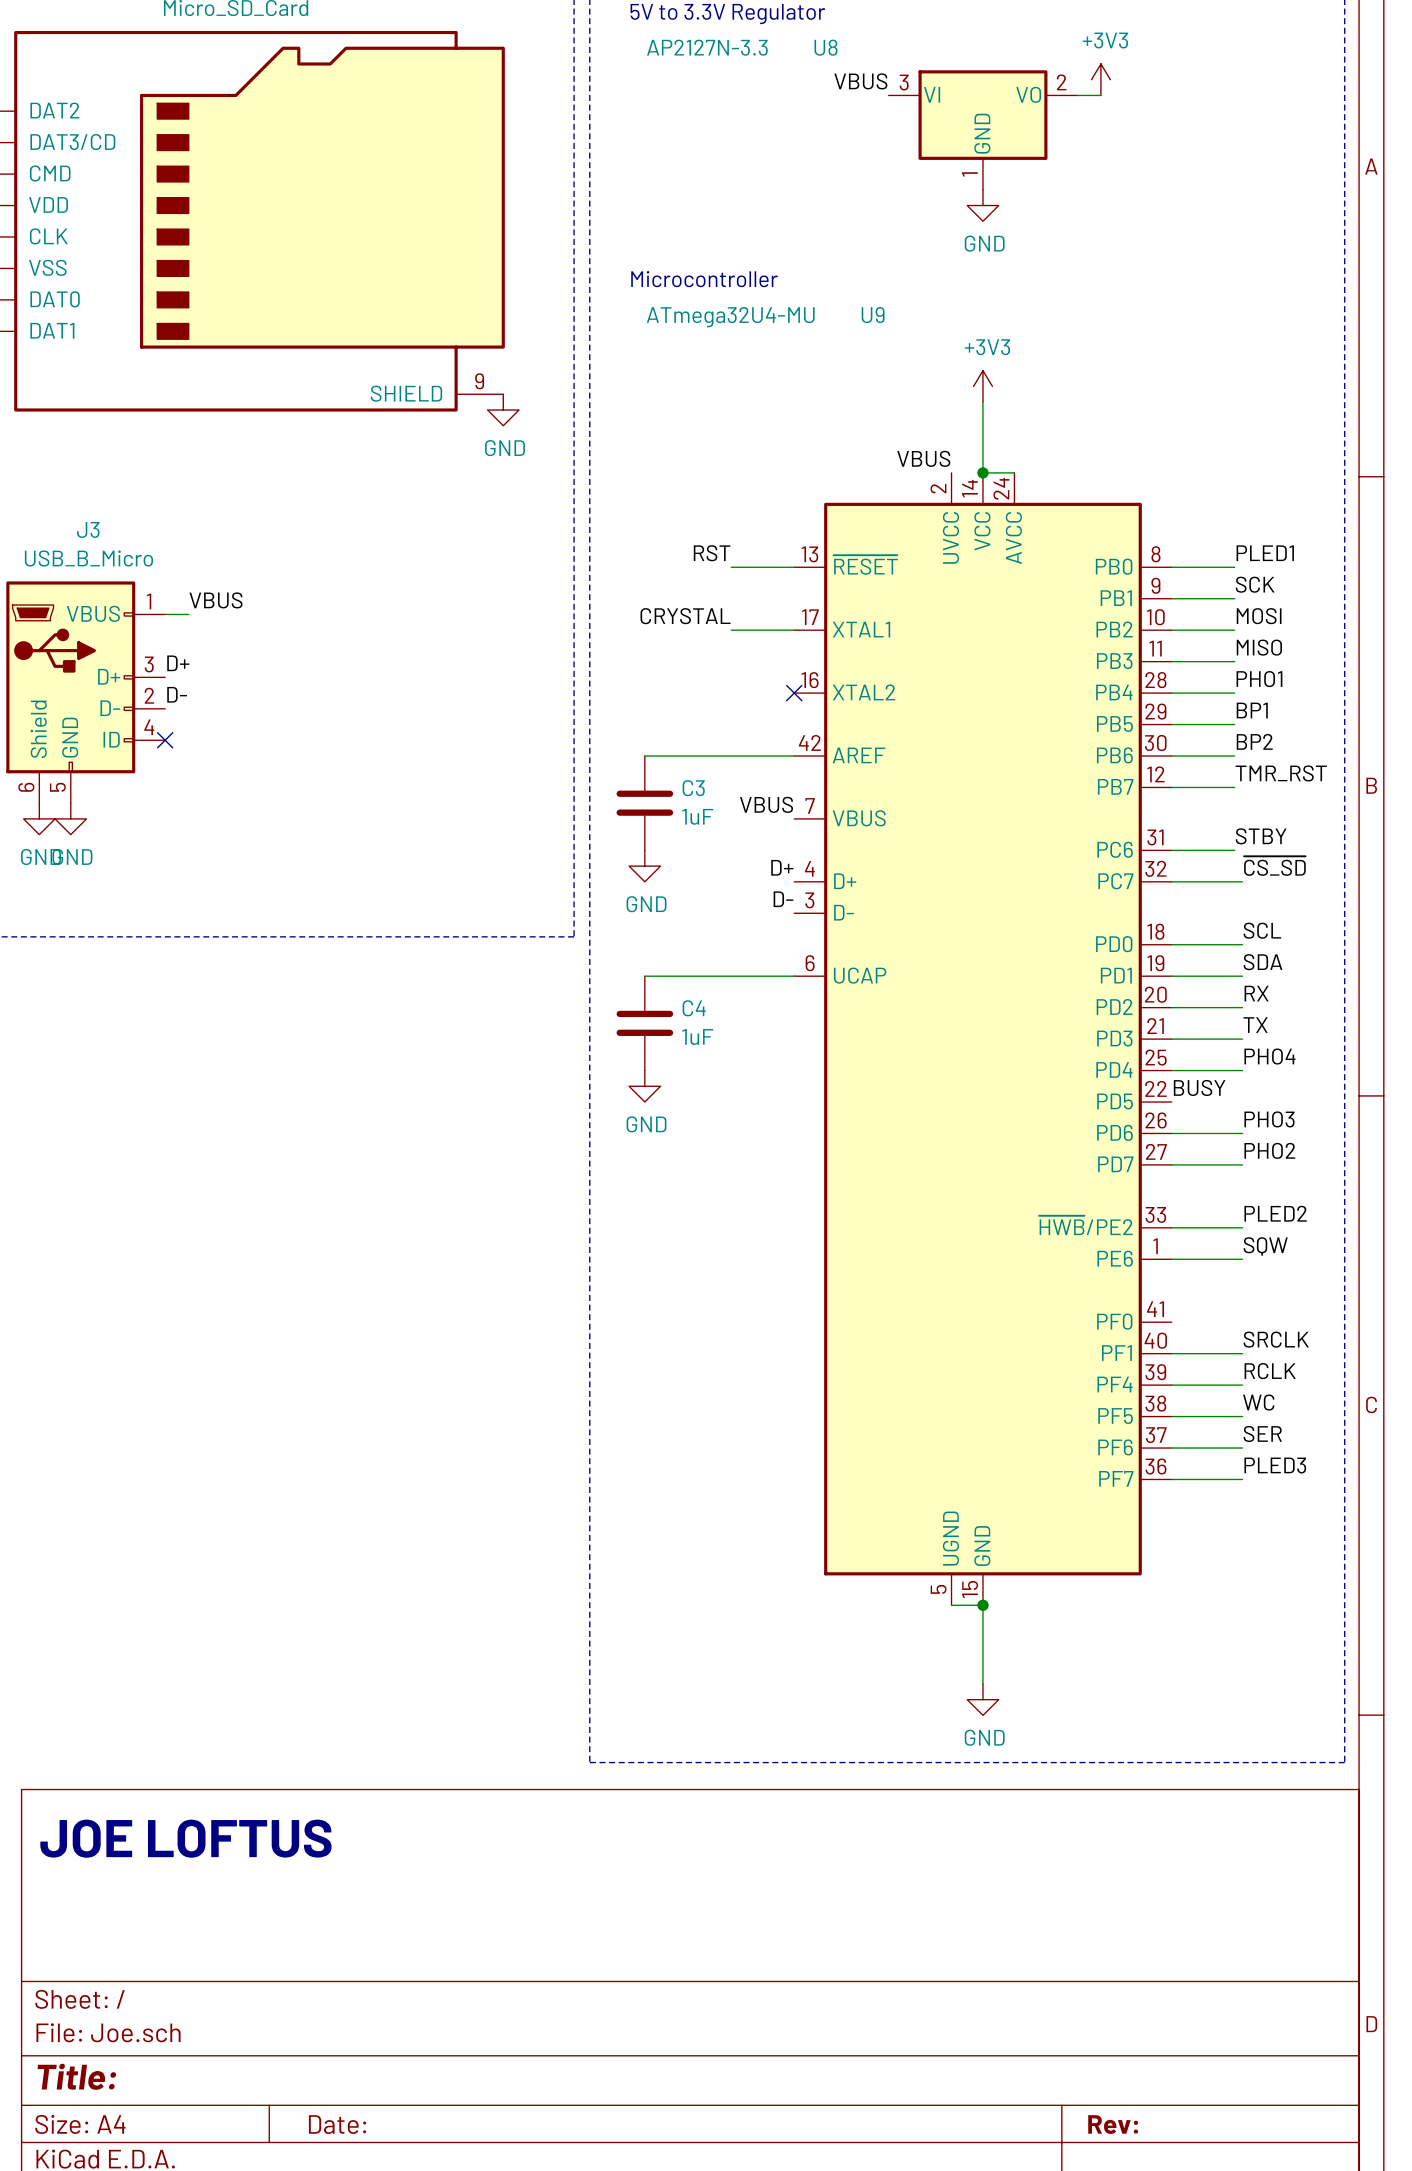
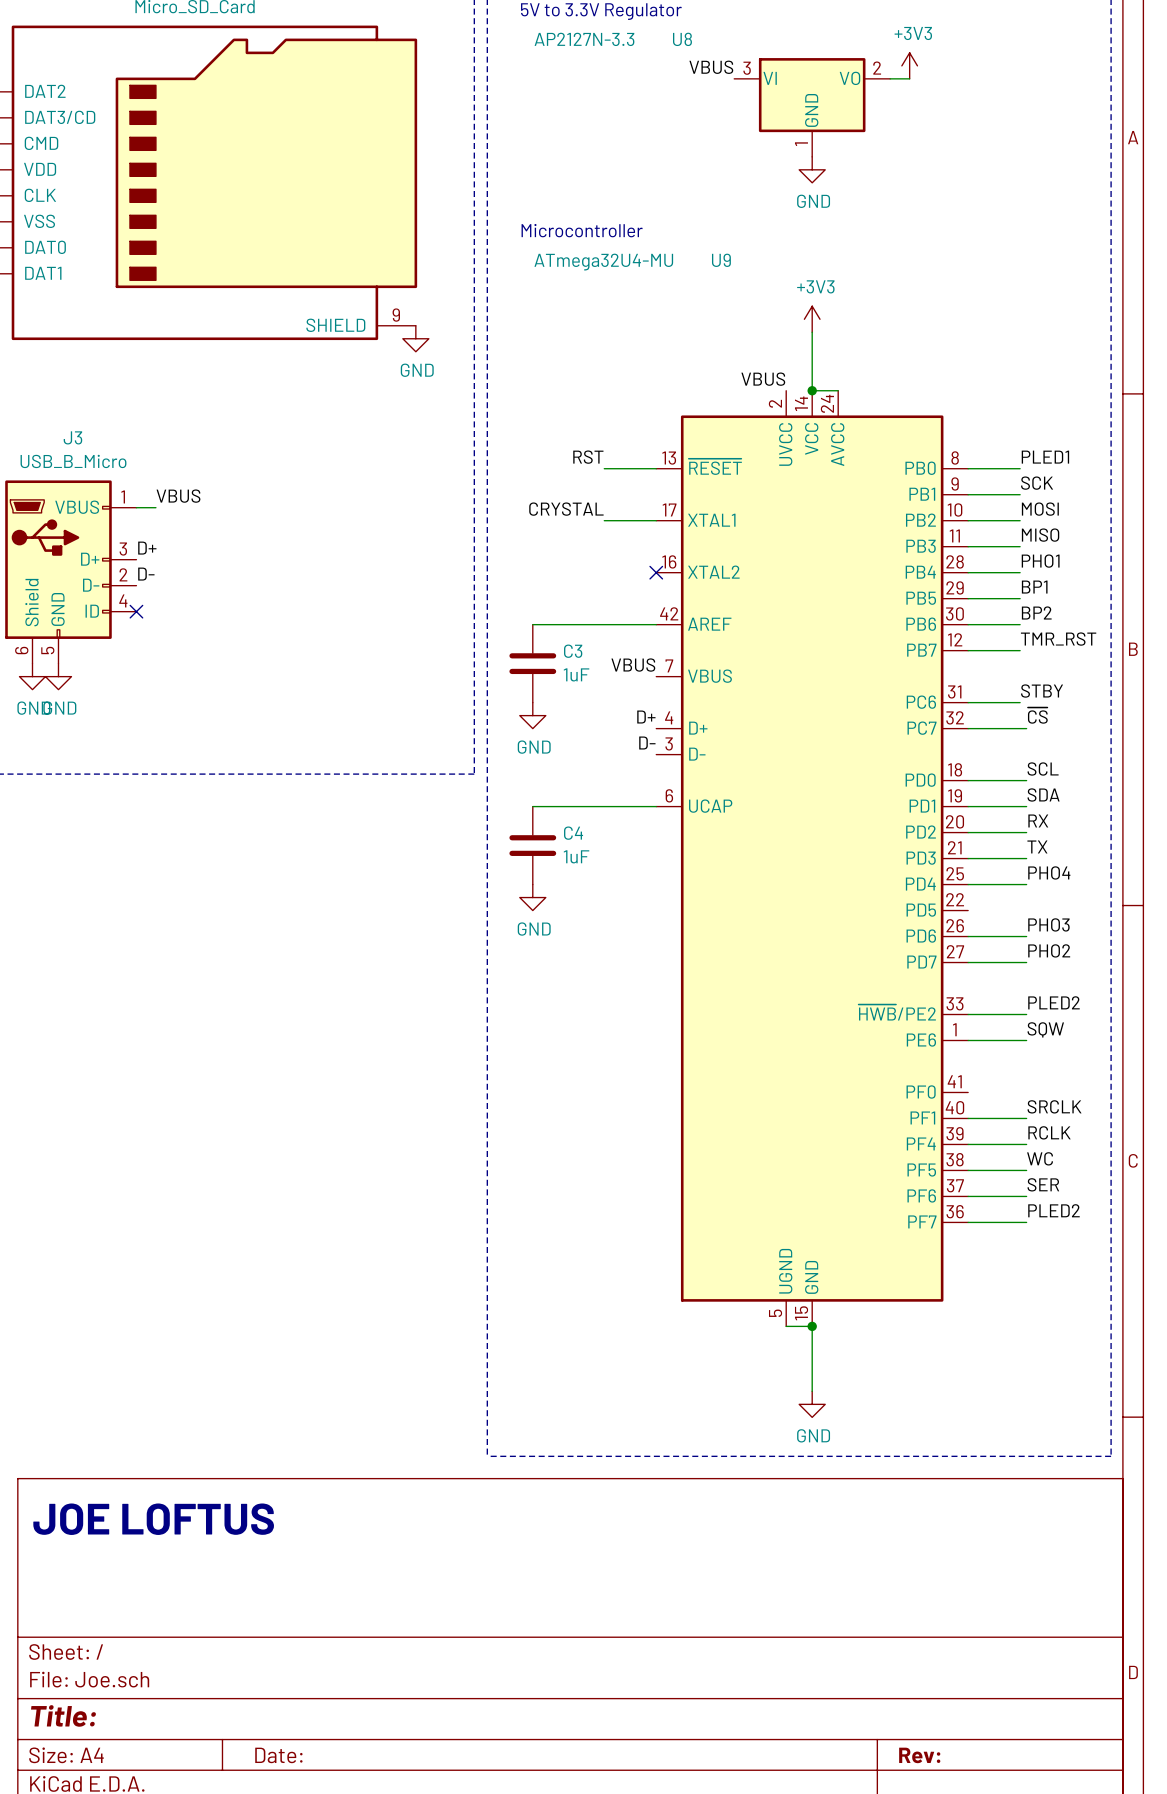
label: ~{CS_SD} (1274, 866) -> ~{CS} (1037, 715)
label: BUSY (1199, 1087) -> none
label: PLED3 (1275, 1465) -> PLED2 (1053, 1210)

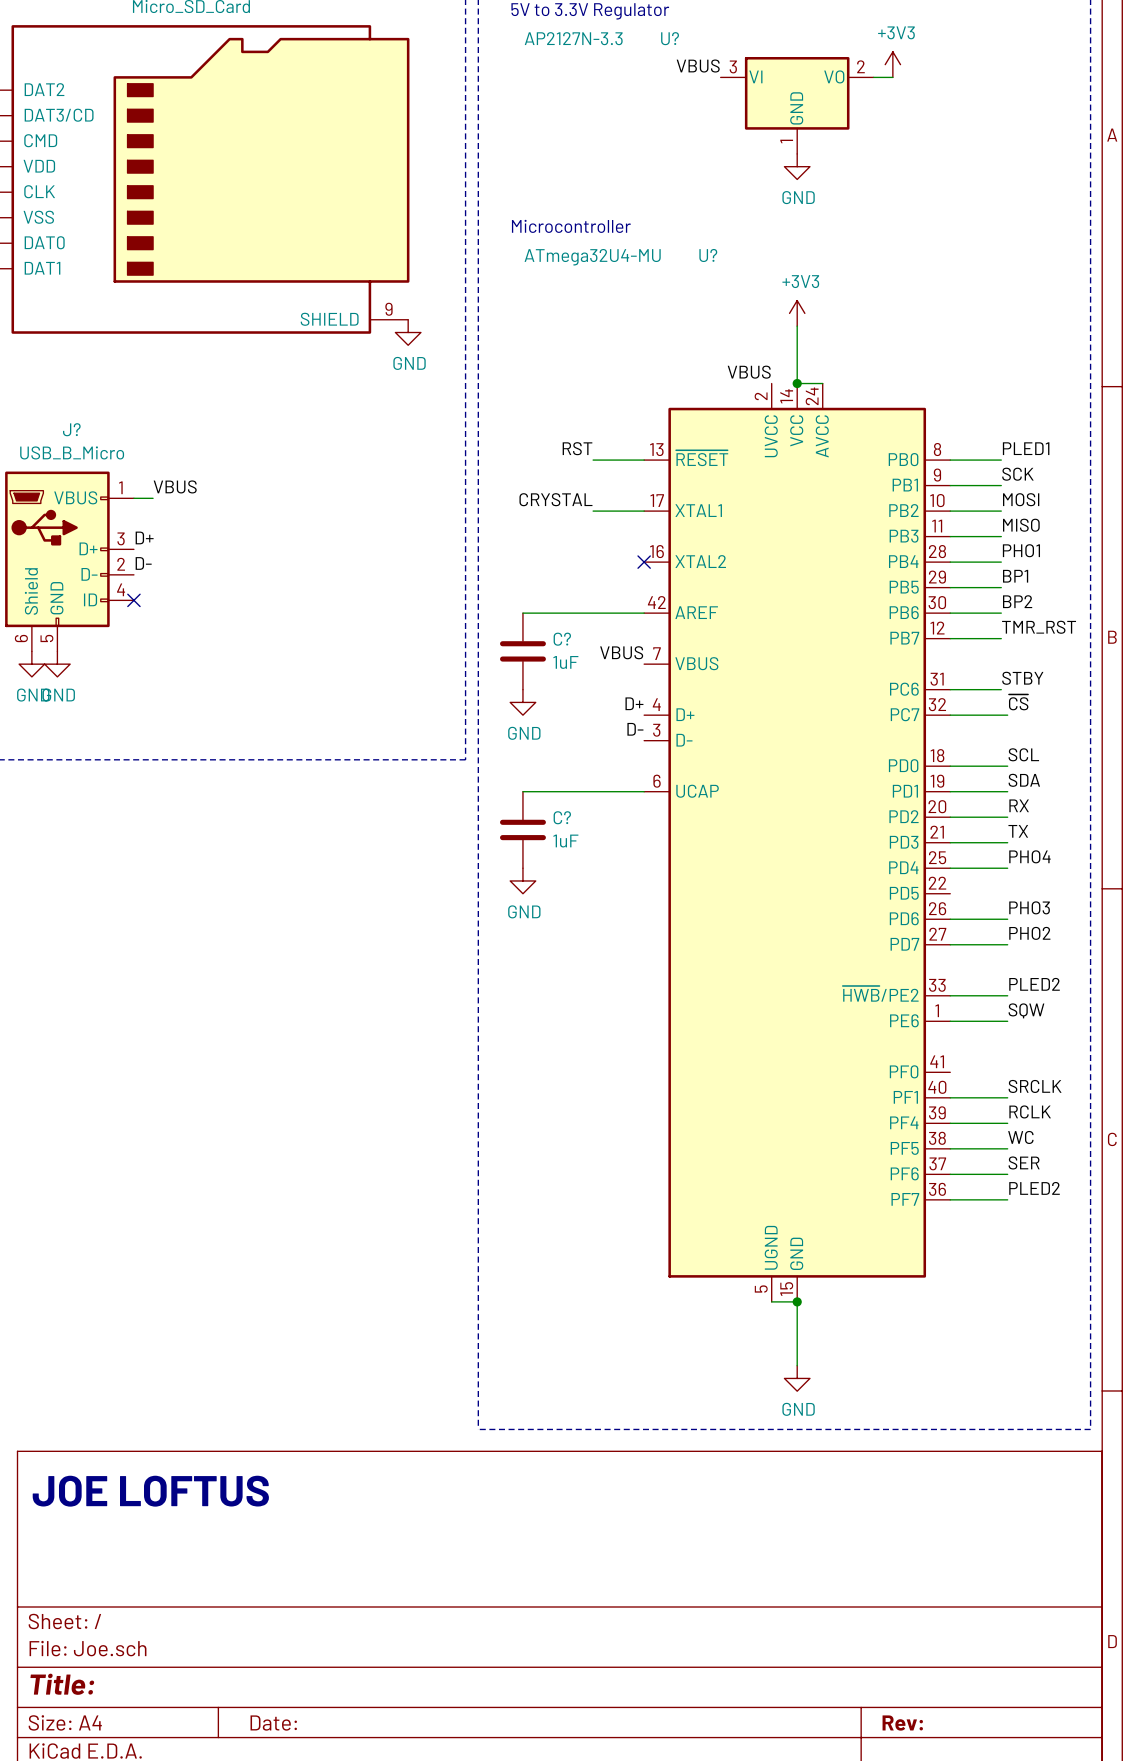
U8 name: U8 (682, 39) -> U? (670, 38)
U9 name: U9 (721, 260) -> U? (708, 255)
J3 name: J3 (72, 437) -> J? (71, 429)
C3 name: C3 (573, 651) -> C? (562, 639)
C4 name: C4 (573, 833) -> C? (562, 817)

